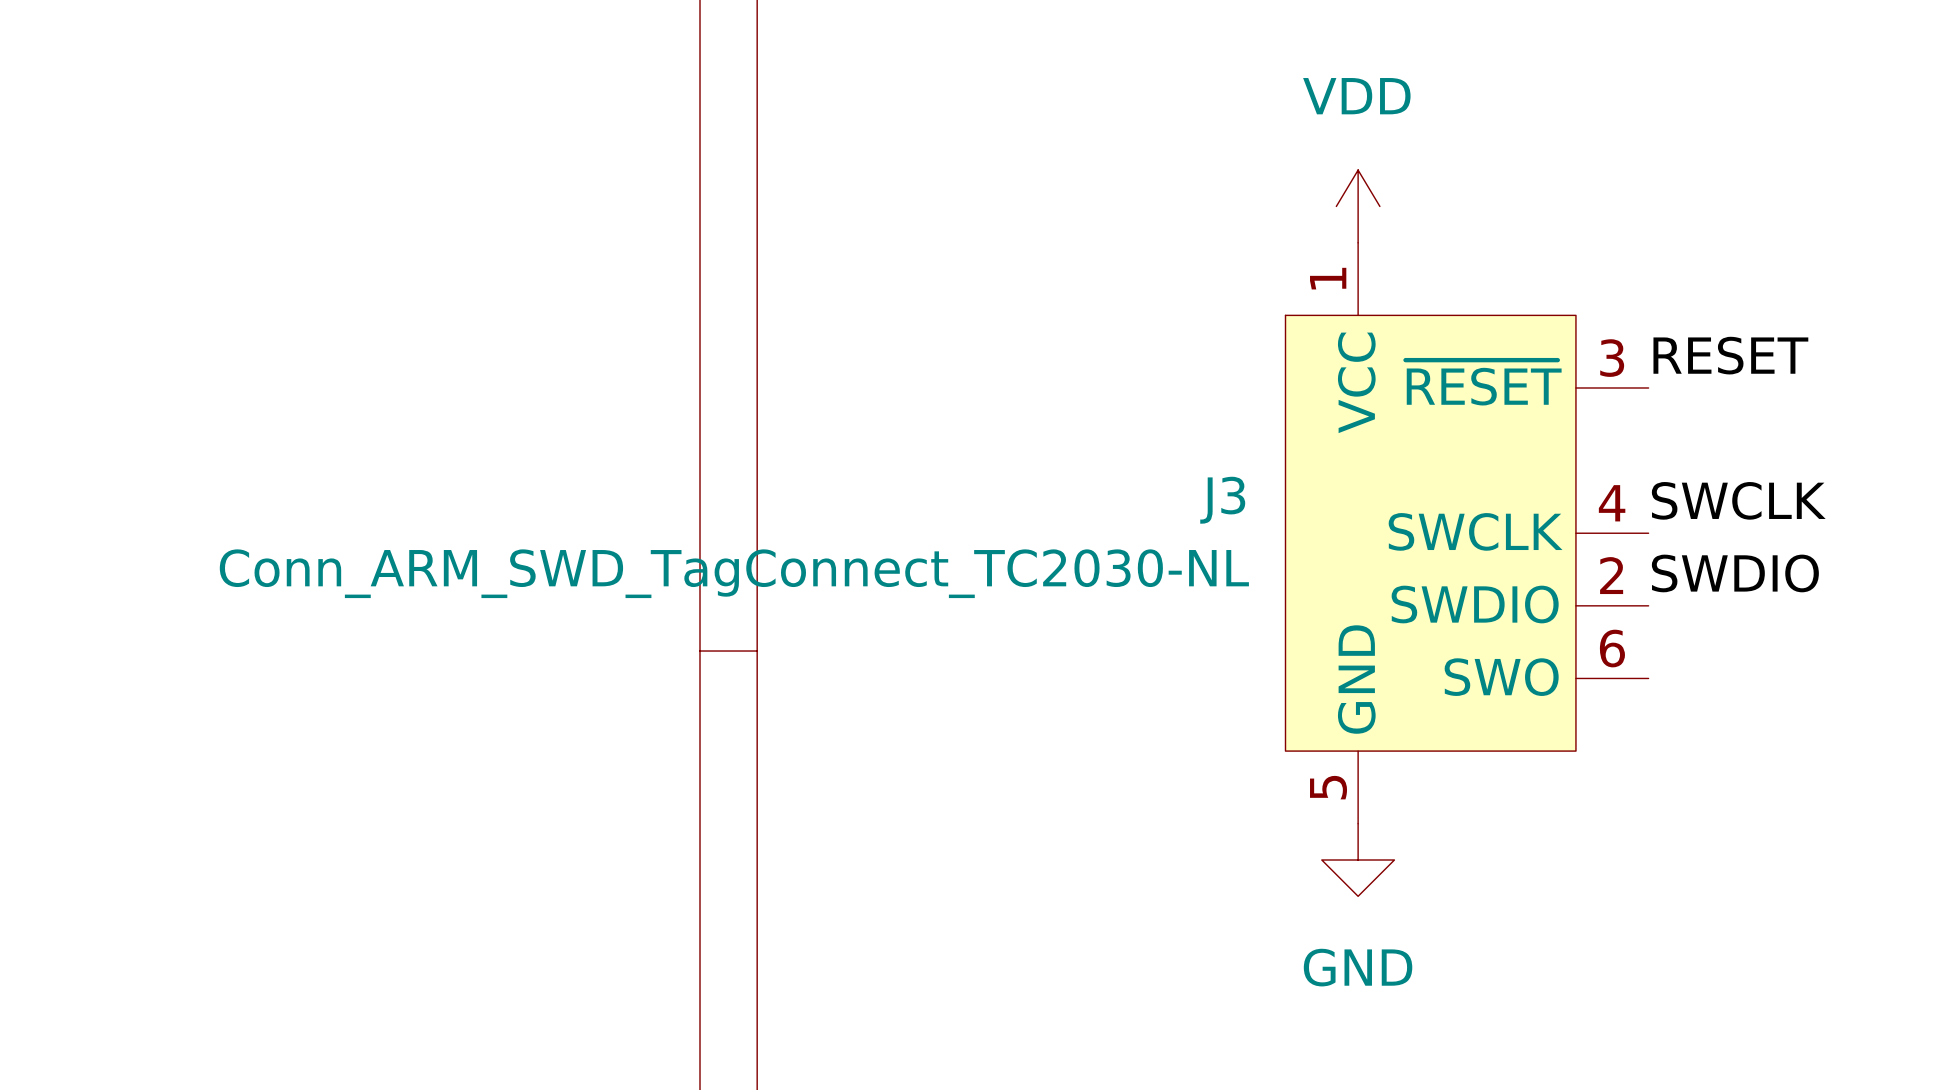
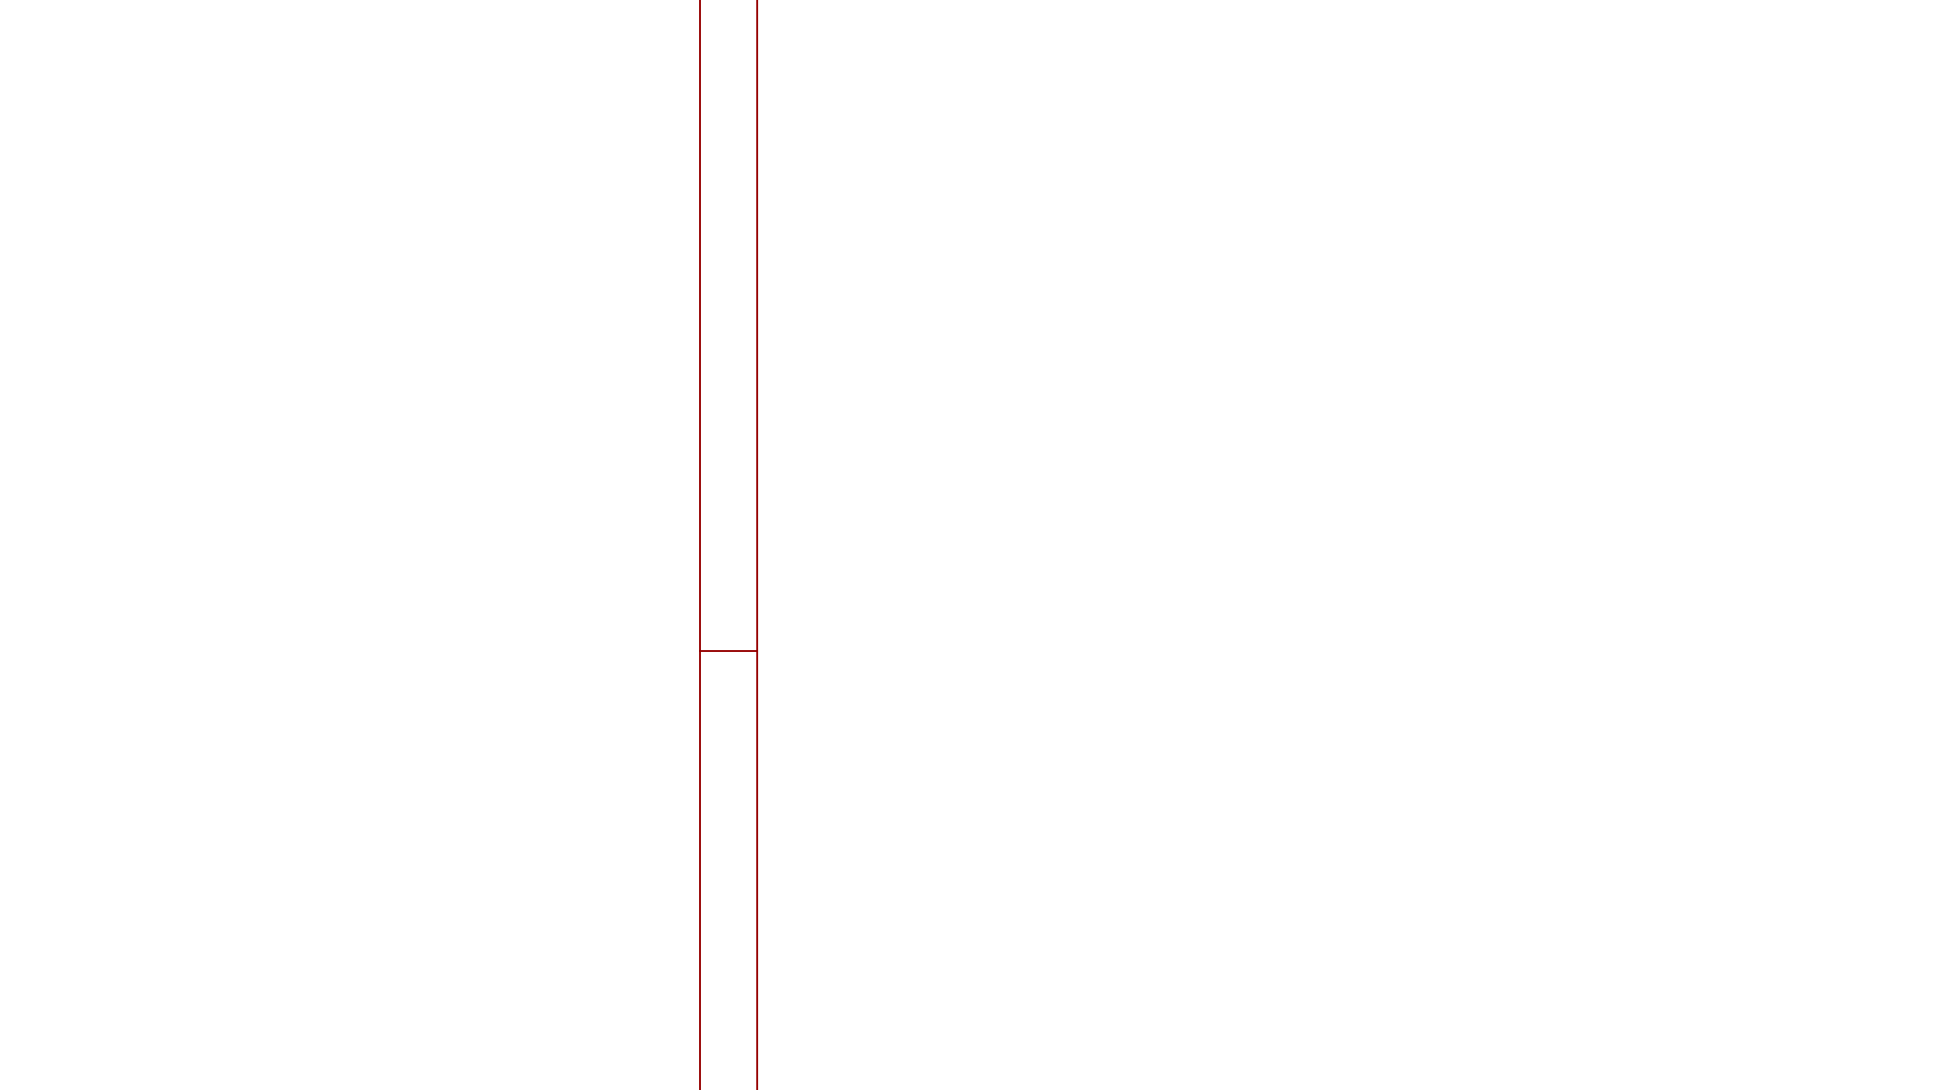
power symbol: VDD (1358, 206) -> none
label: RESET (1730, 355) -> none
label: SWCLK (1738, 500) -> none
J3: Conn_ARM_SWD_TagConnect_TC2030-NL (1467, 533) -> none
label: SWDIO (1735, 573) -> none
power symbol: GND (1358, 860) -> none

